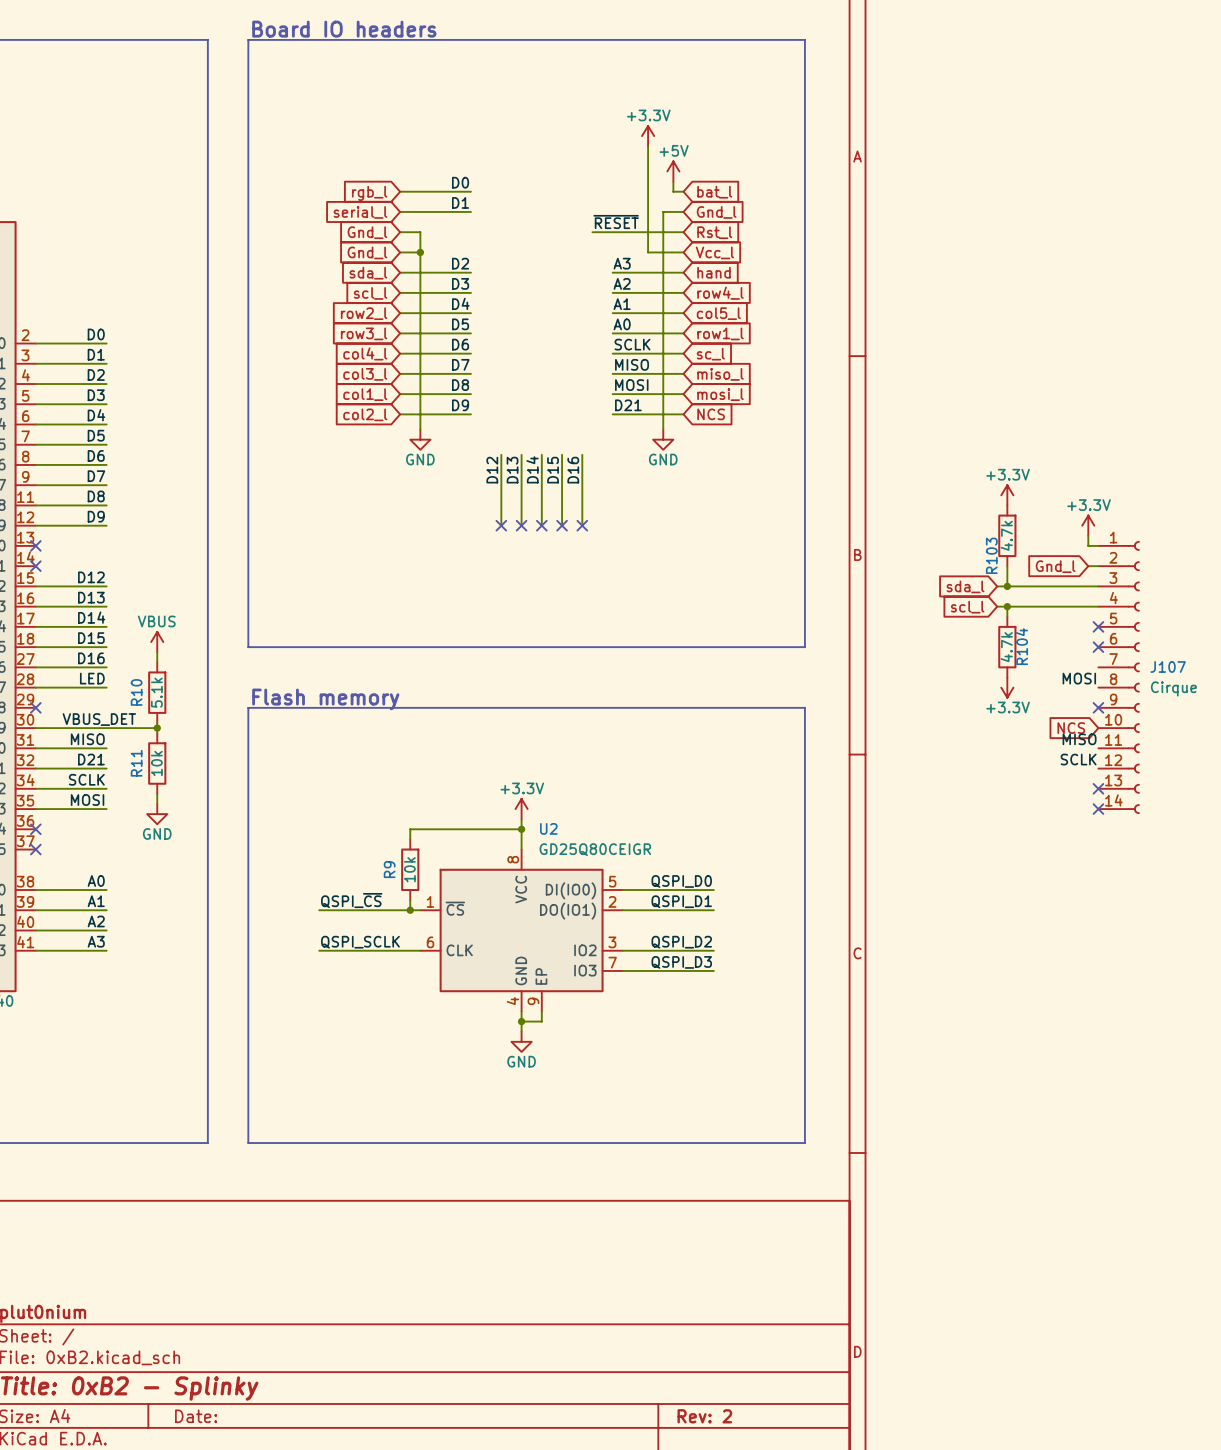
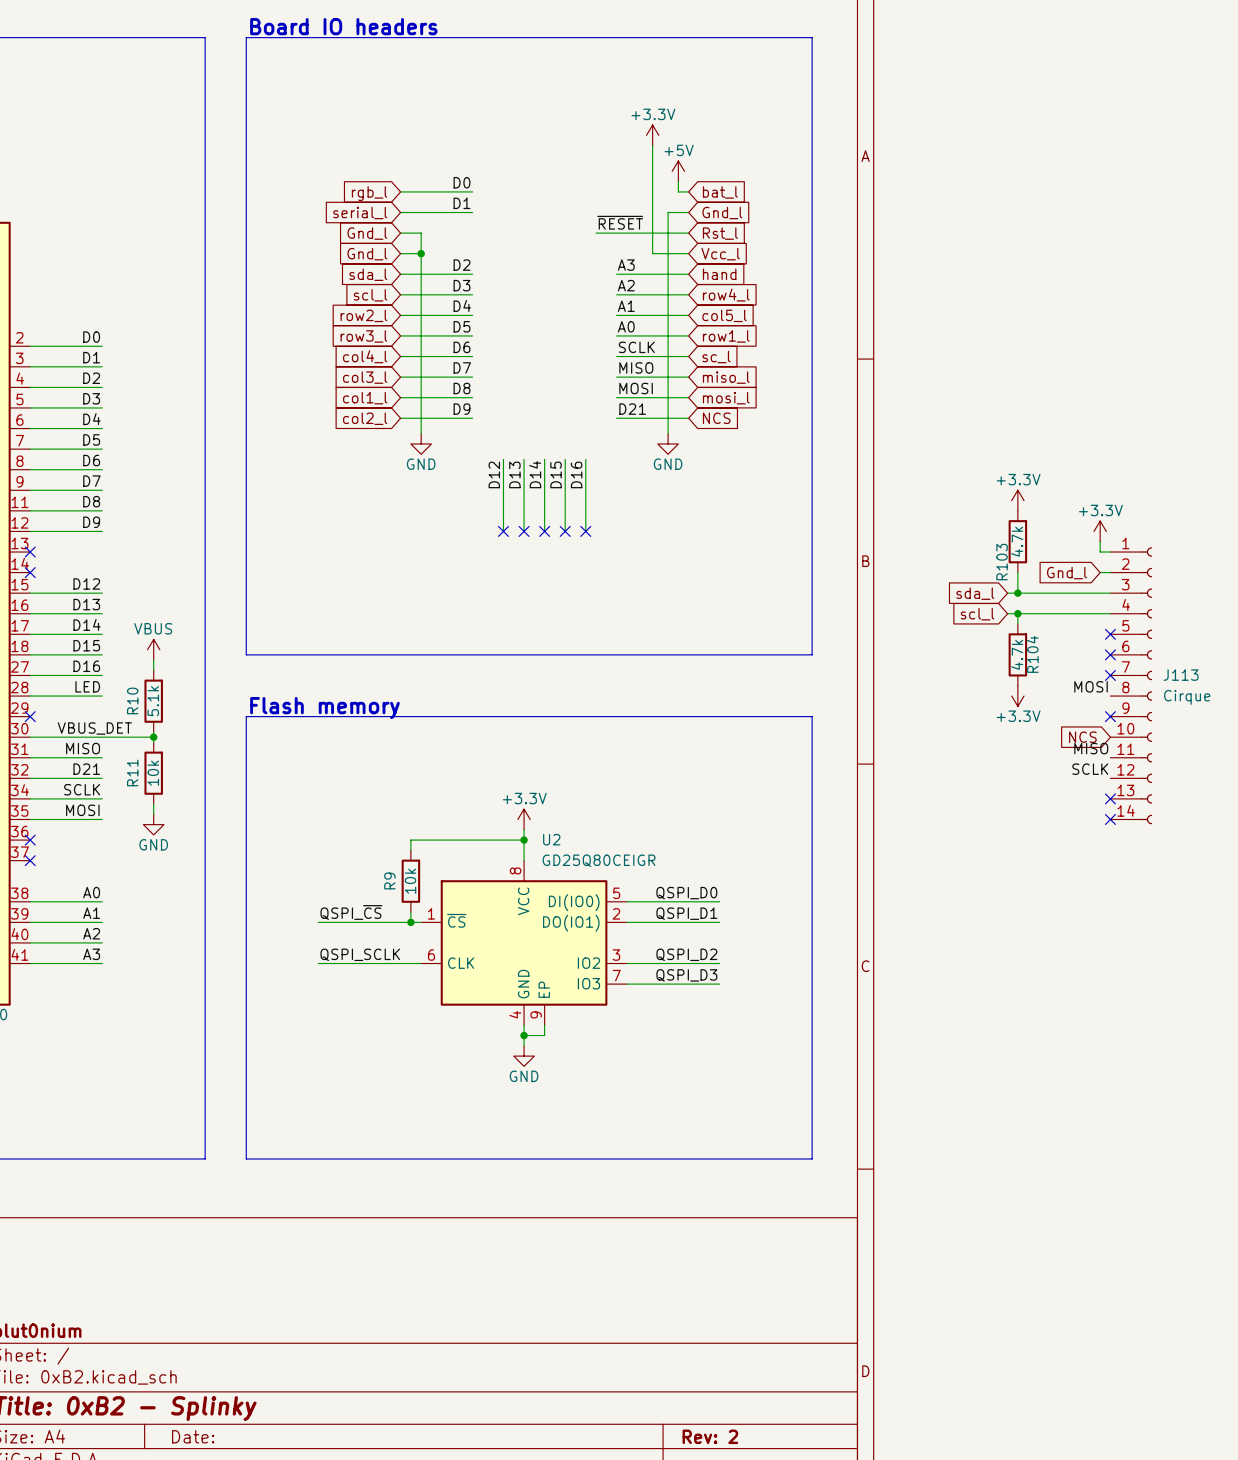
J107 name: J107 (1168, 666) -> J113 (1181, 675)
no-connect mark: none -> (1110, 675)

